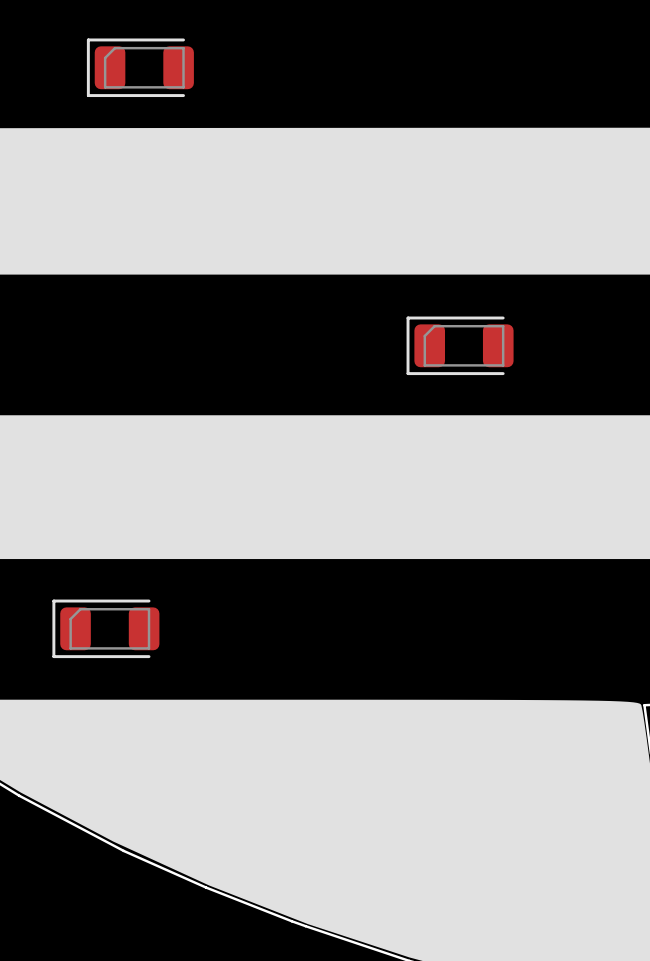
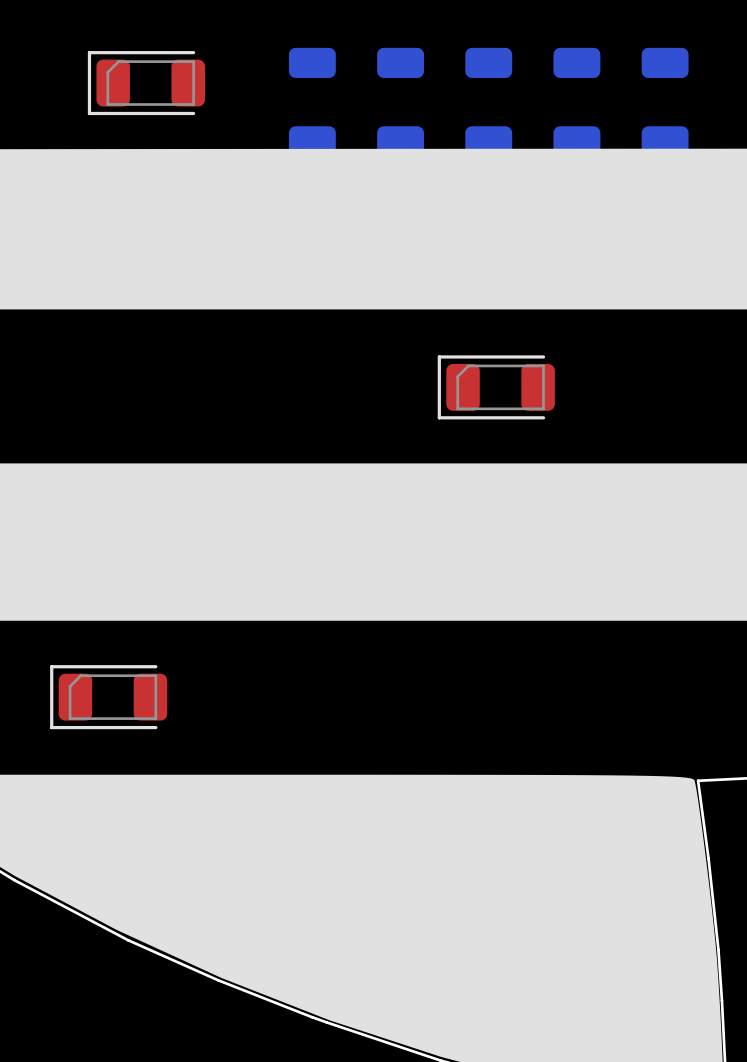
part: none -> (312, 102)
part: none -> (400, 102)
part: none -> (488, 102)
part: none -> (576, 102)
part: none -> (665, 102)

